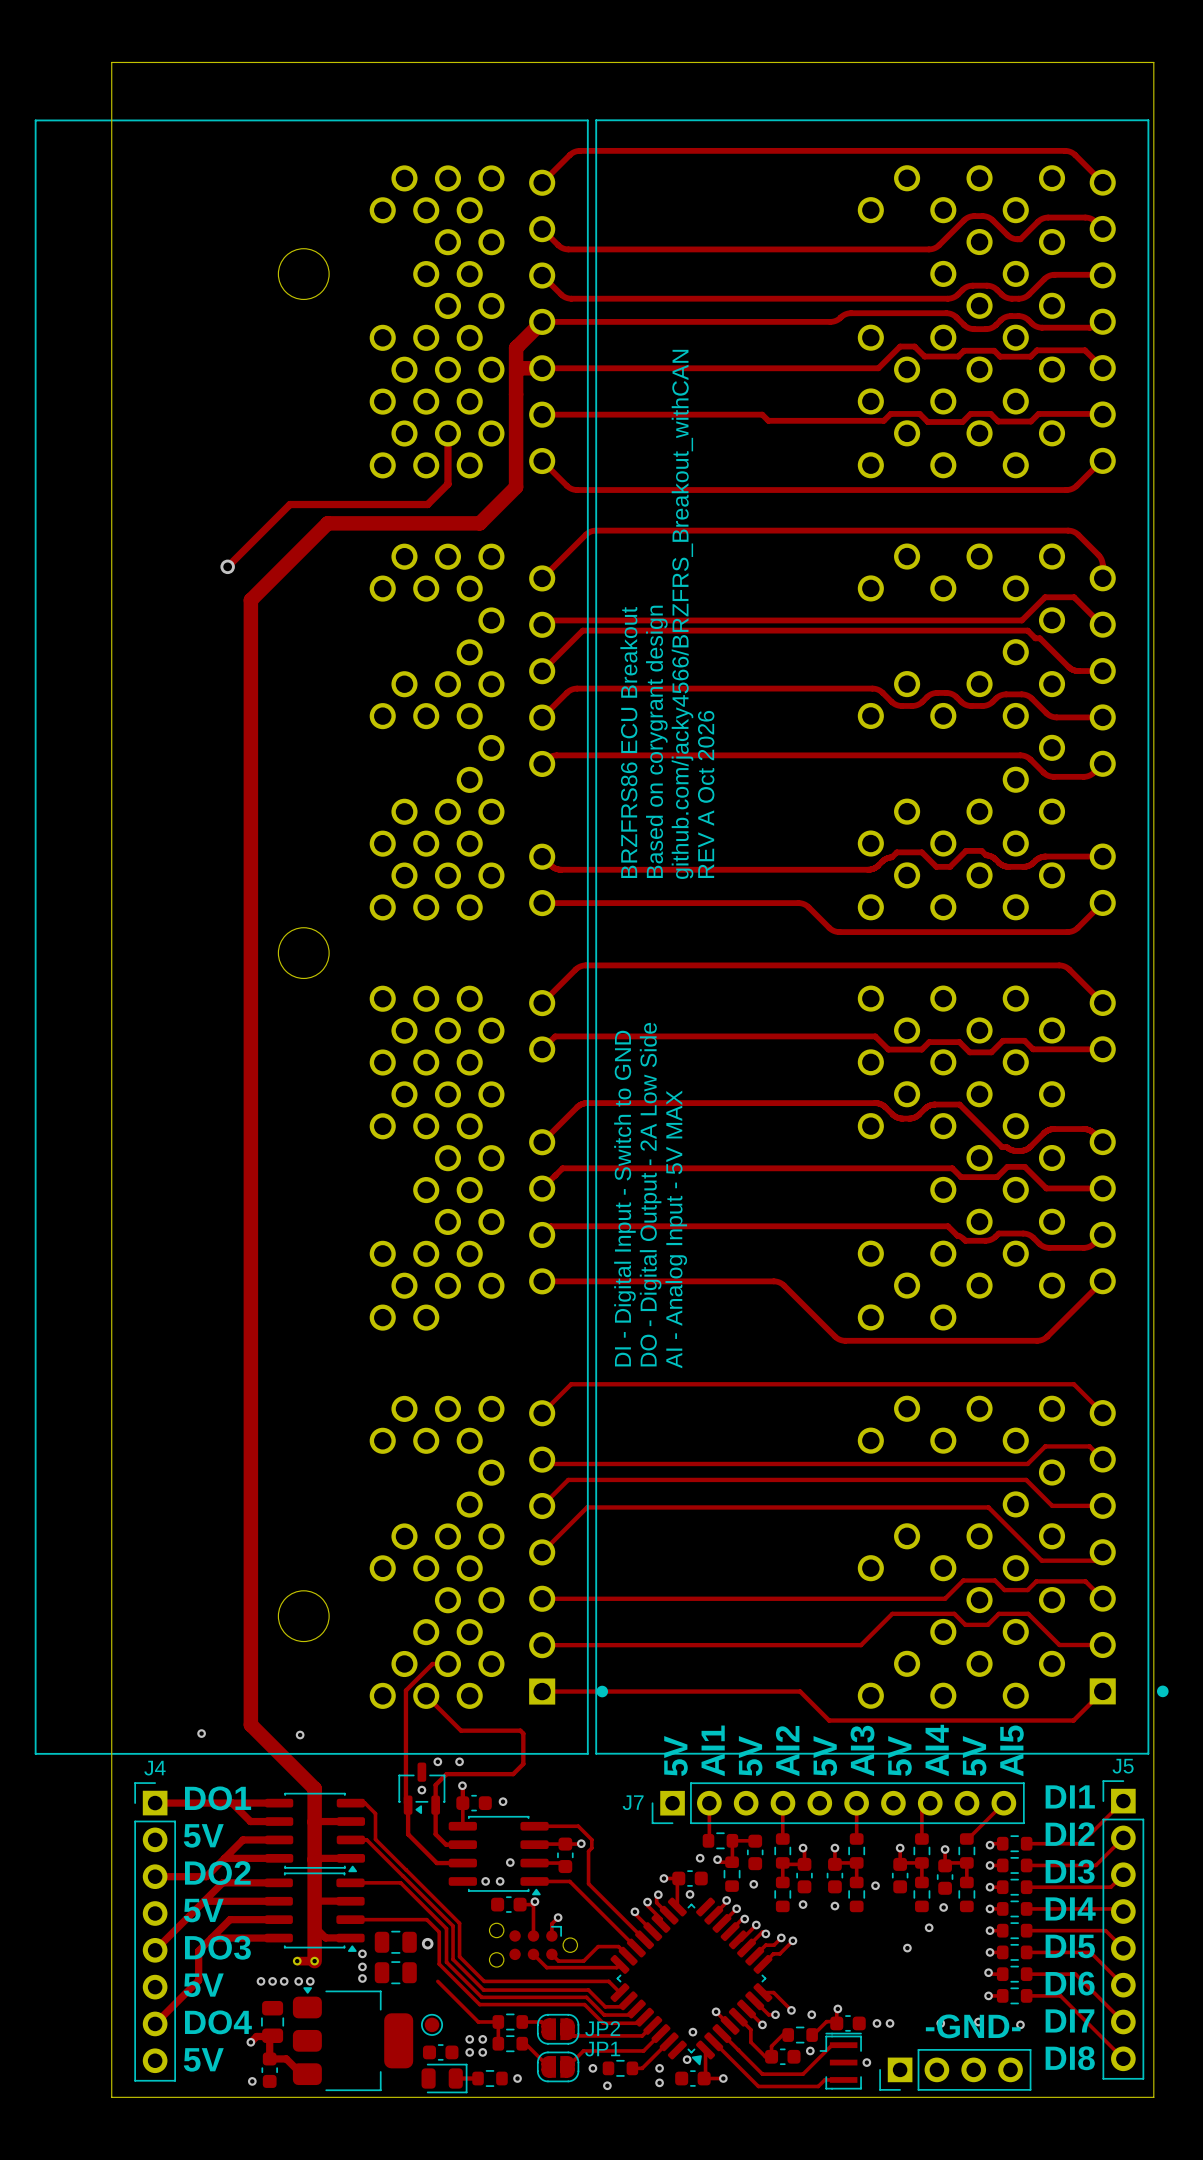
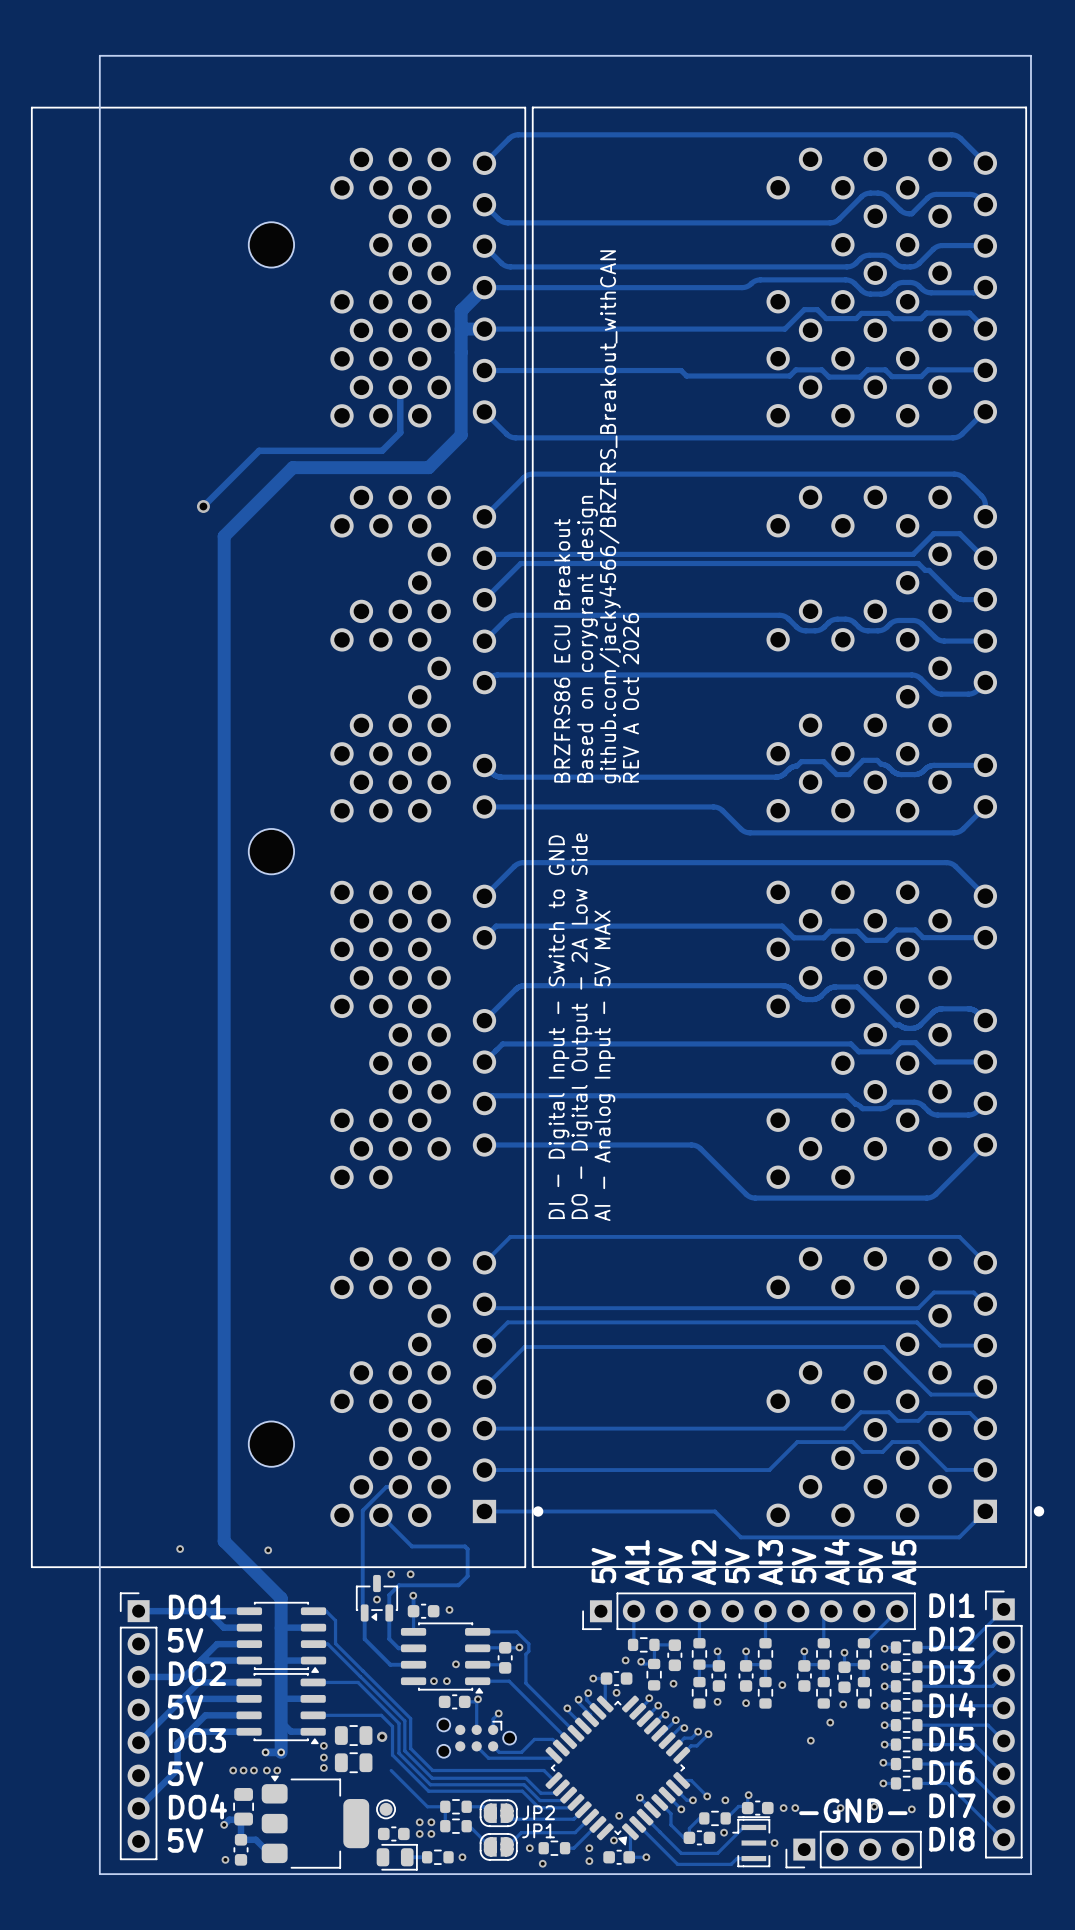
J5 name: J5 (1123, 1766) -> none
J4 name: J4 (154, 1768) -> none
J7 name: J7 (633, 1802) -> none

